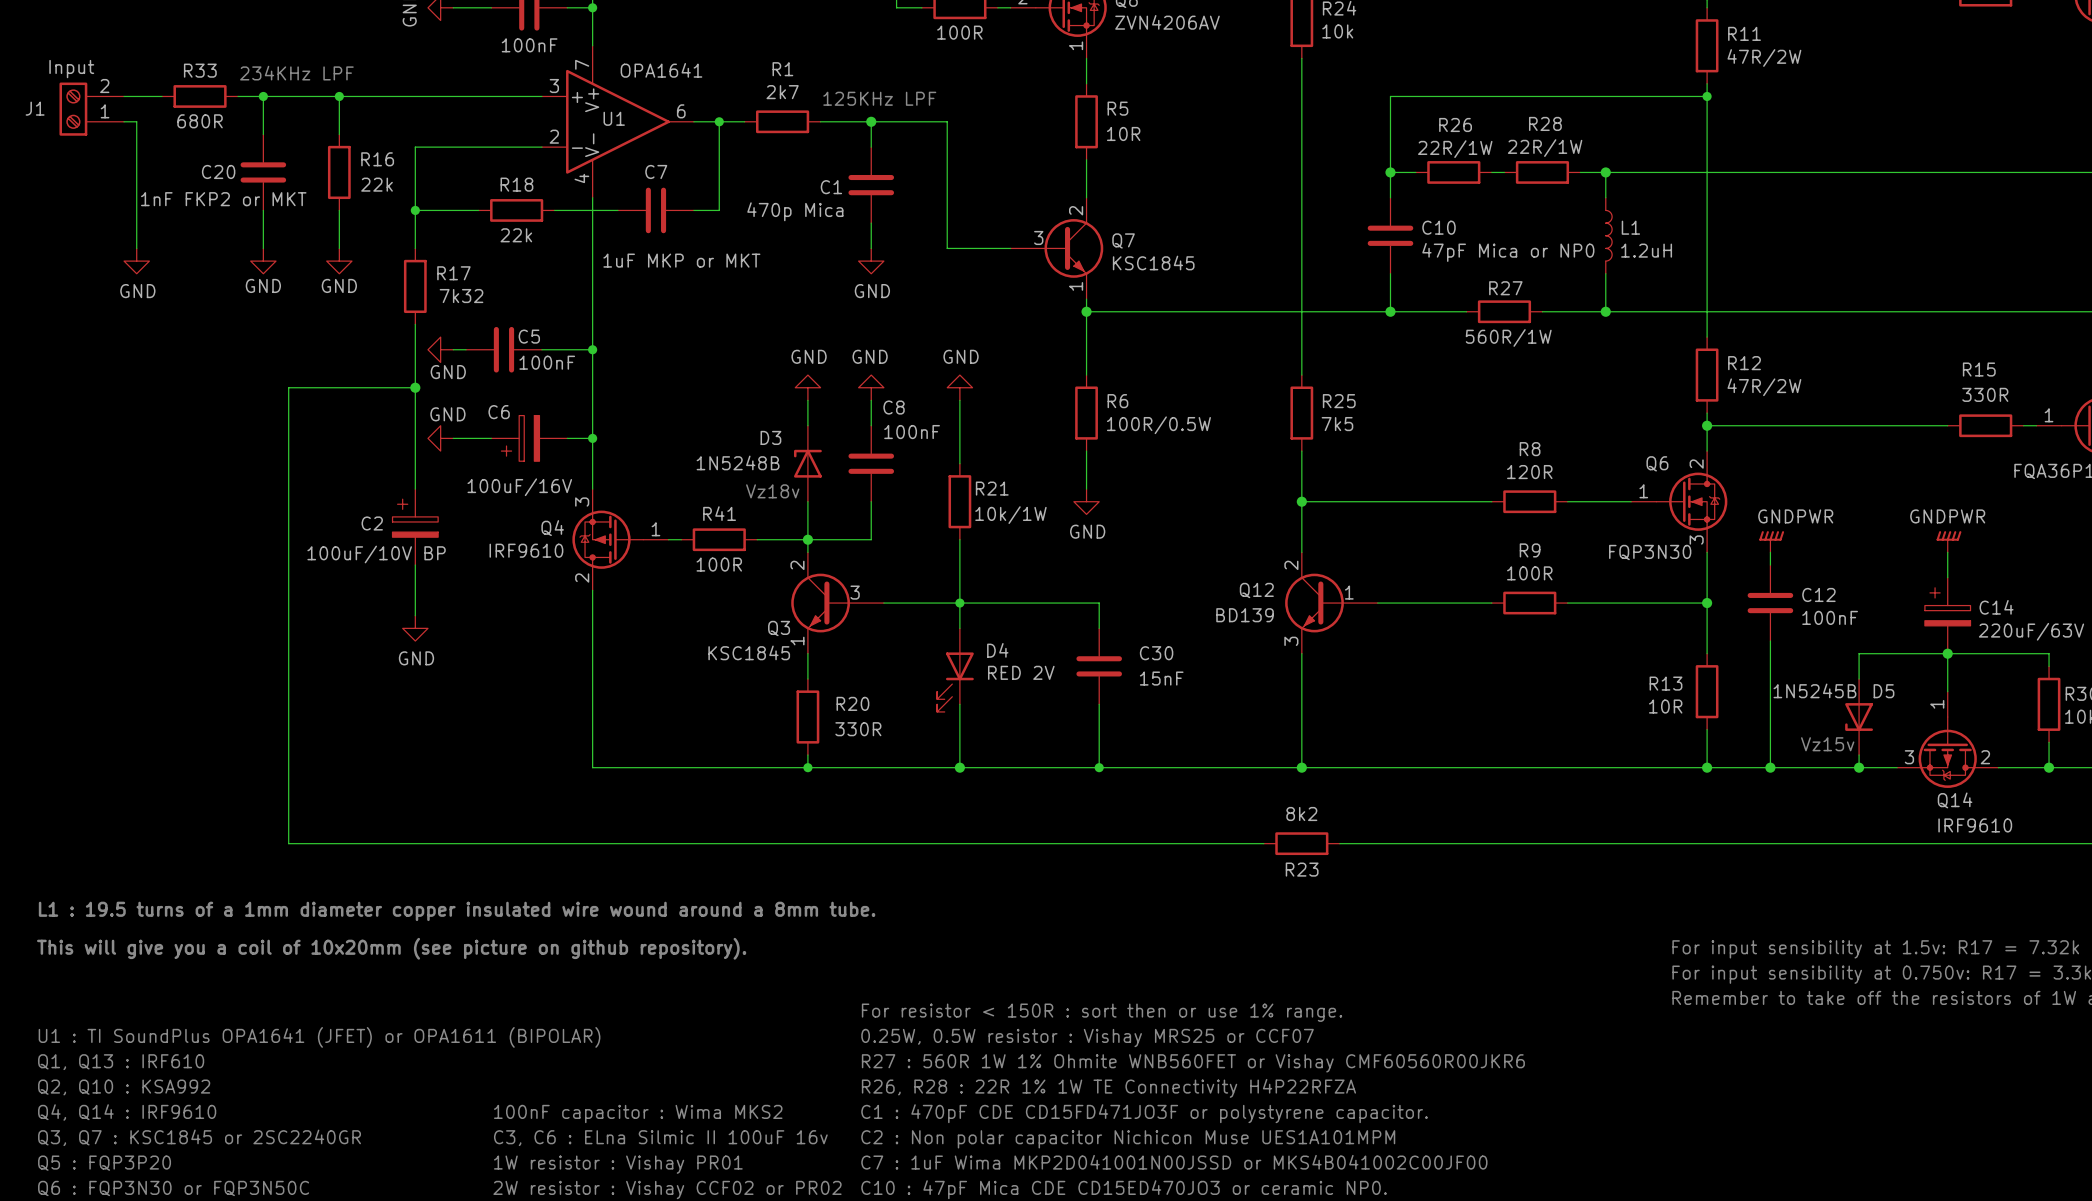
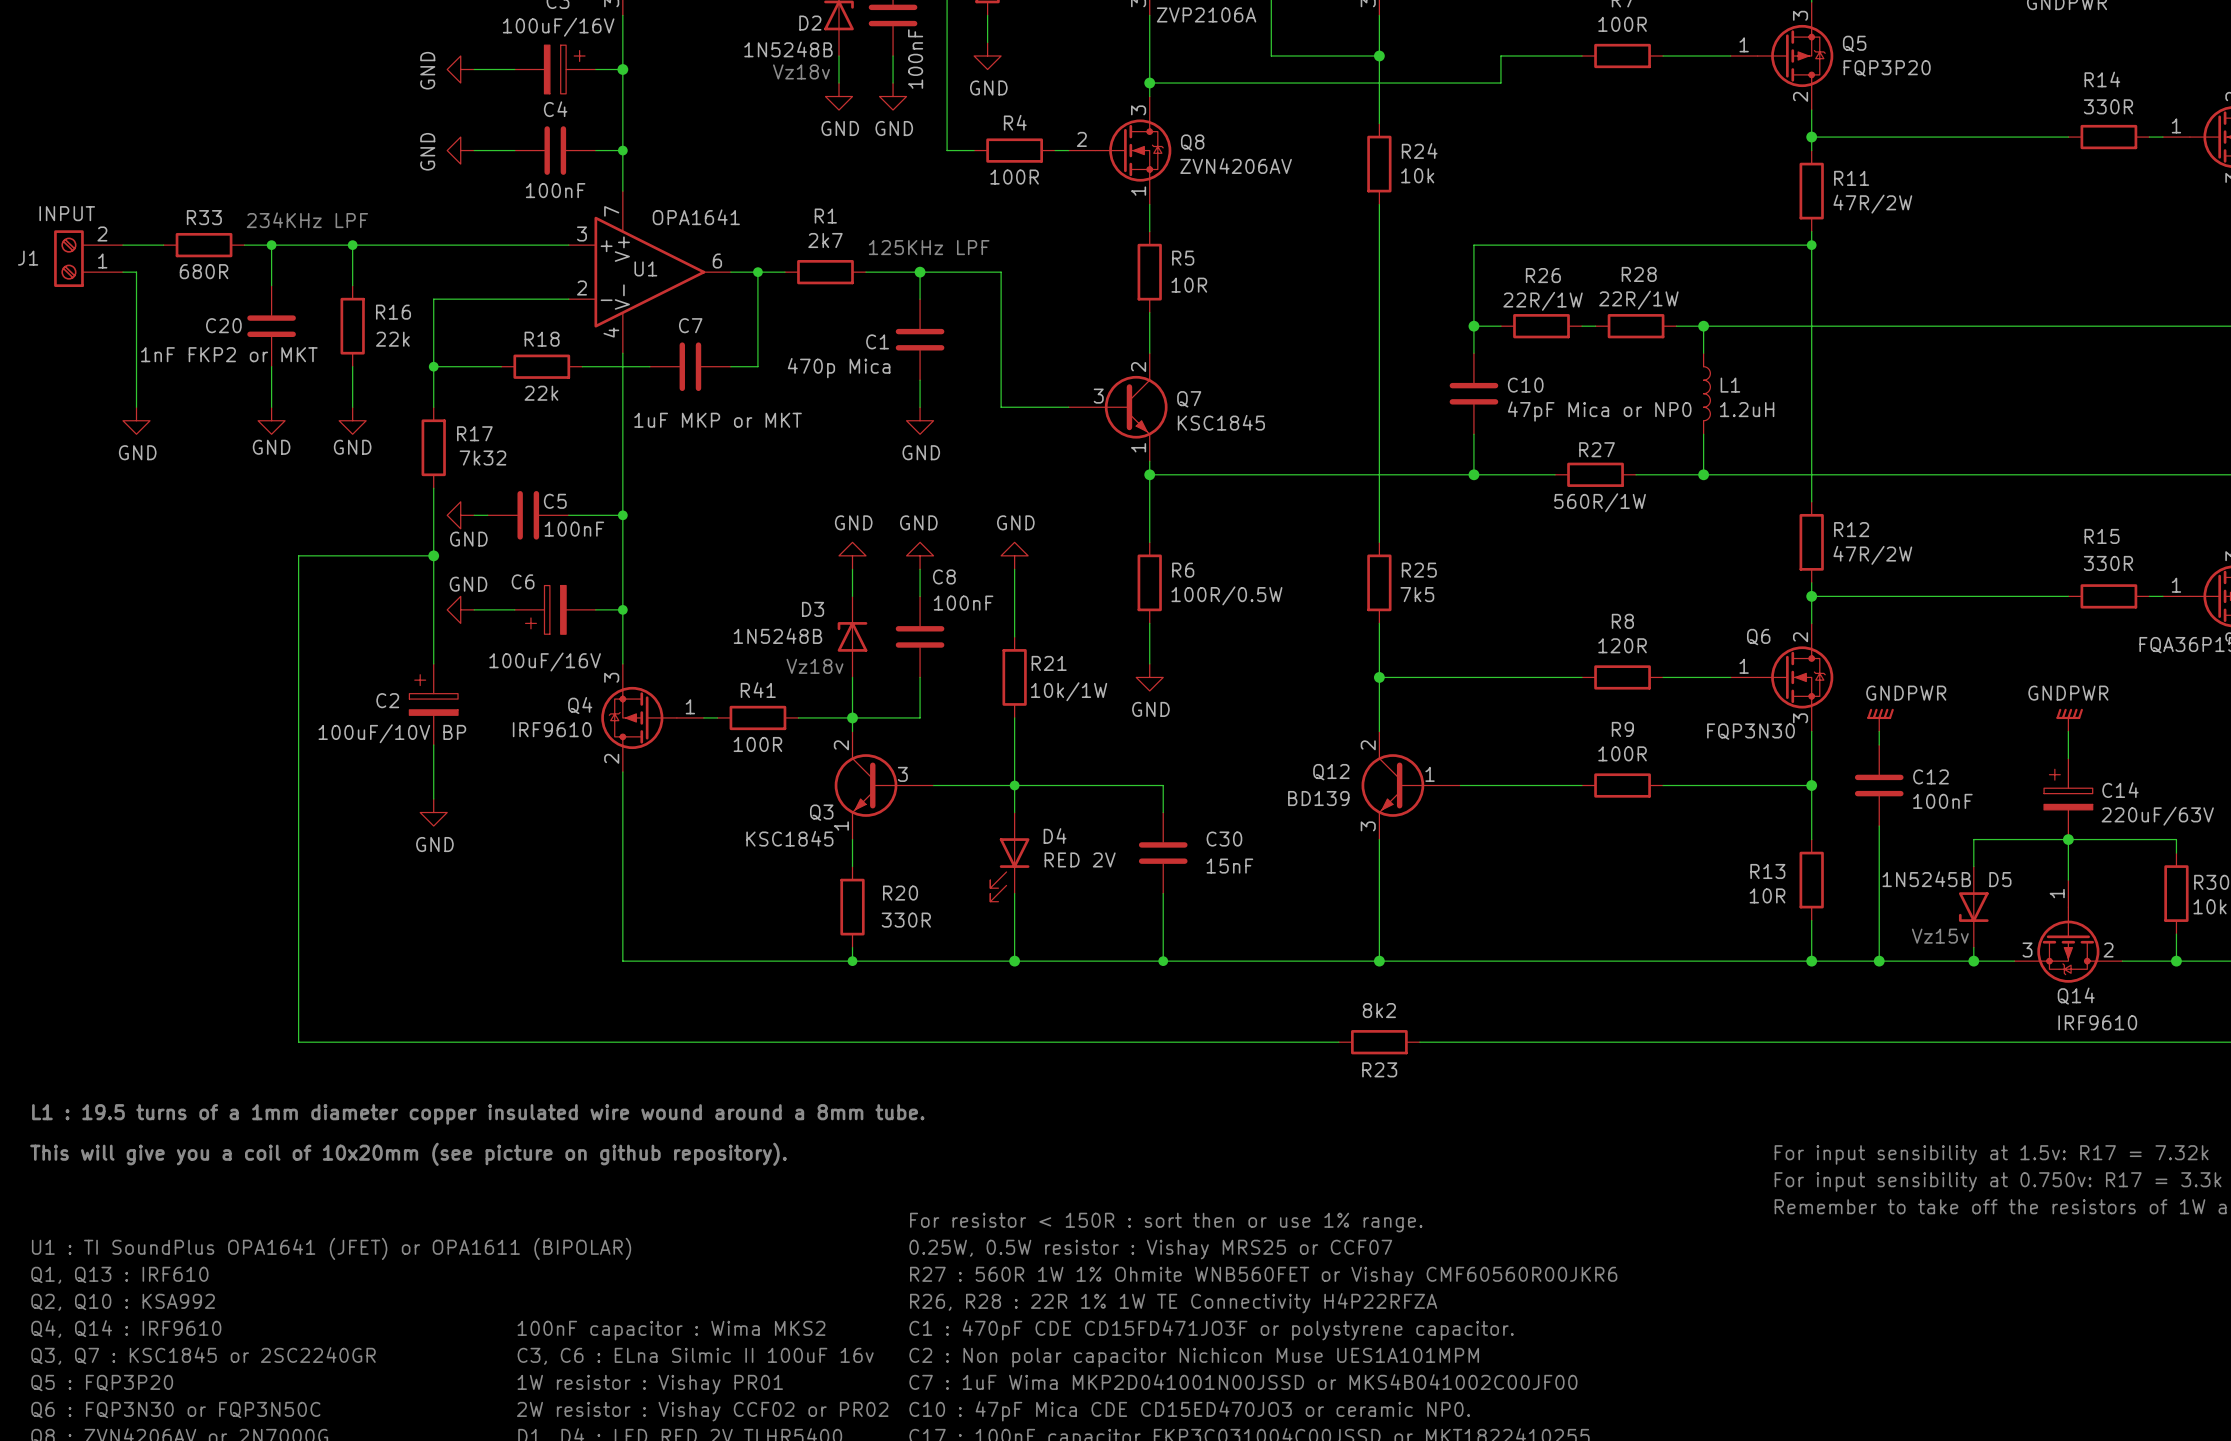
J1 value: Input (71, 69) -> INPUT (67, 213)

